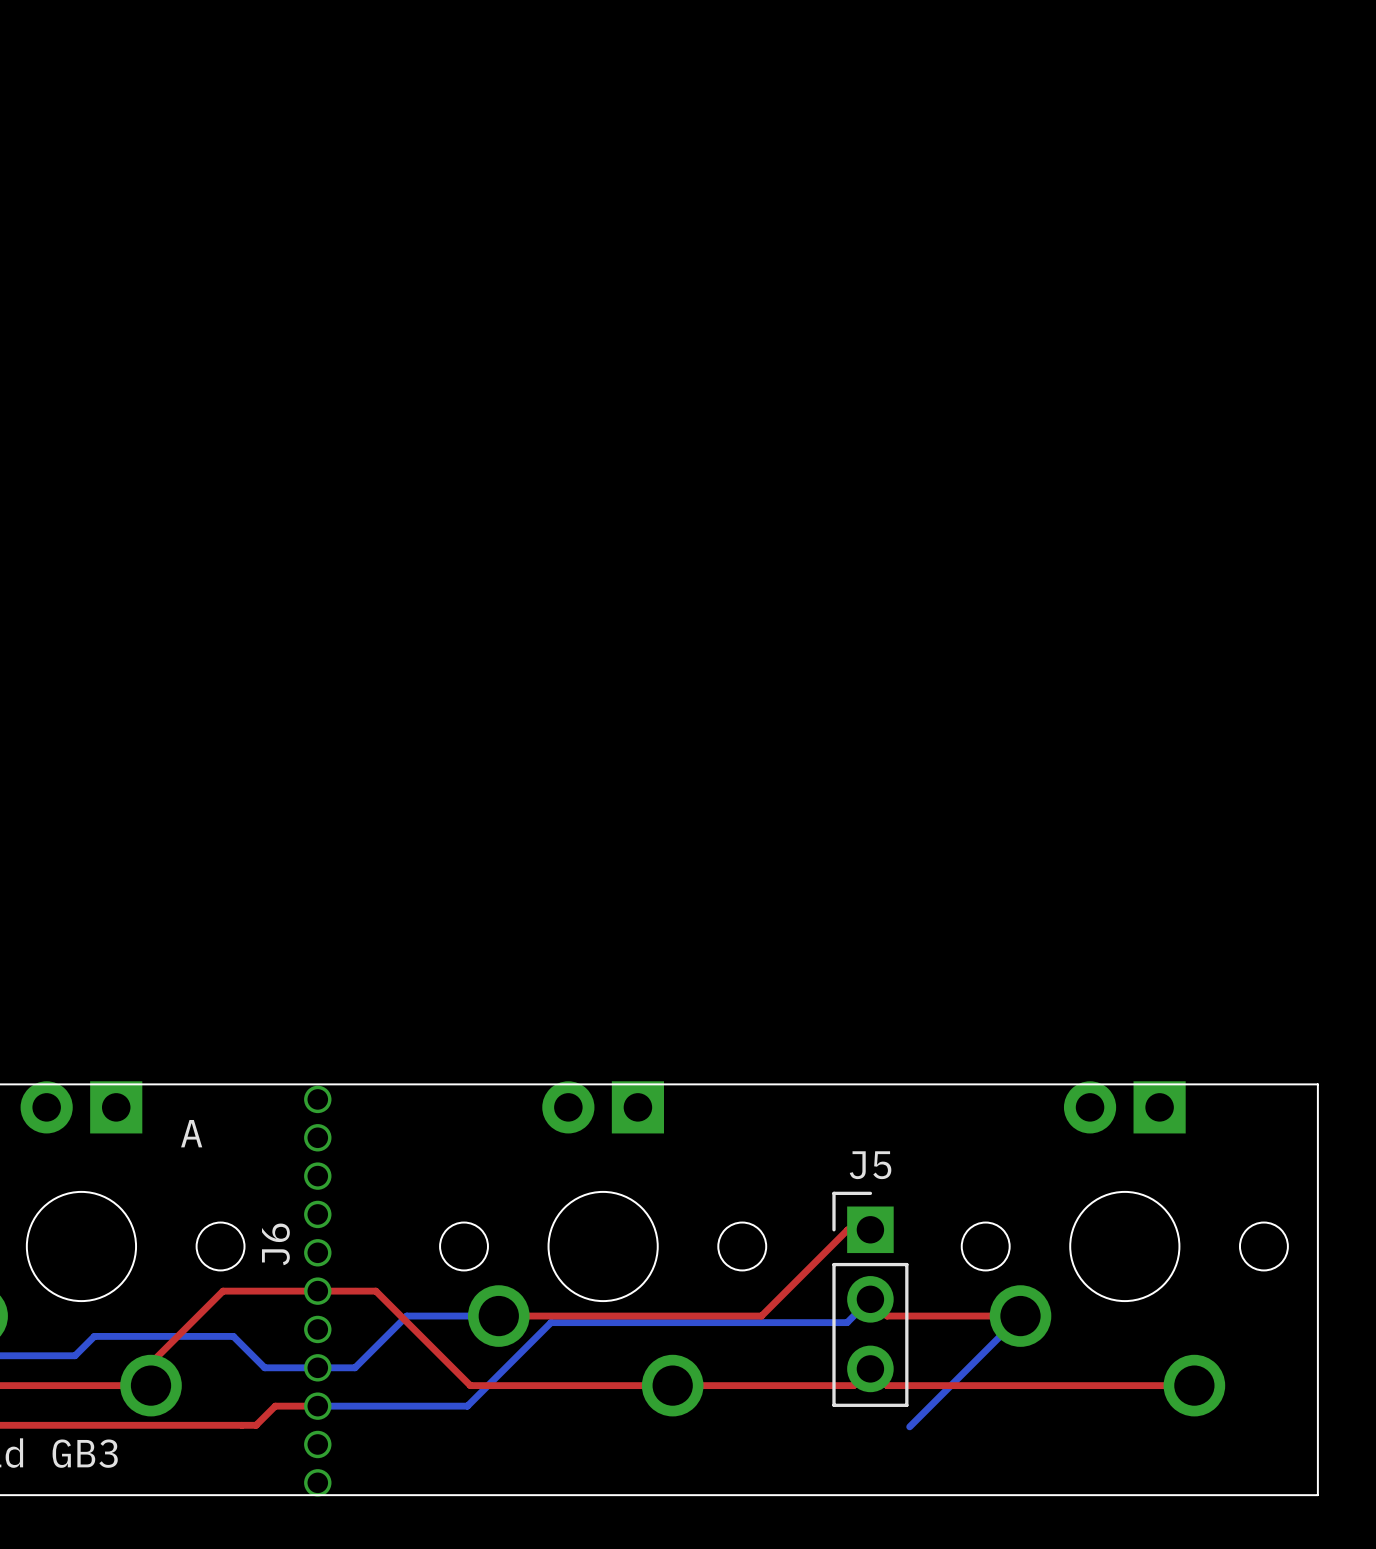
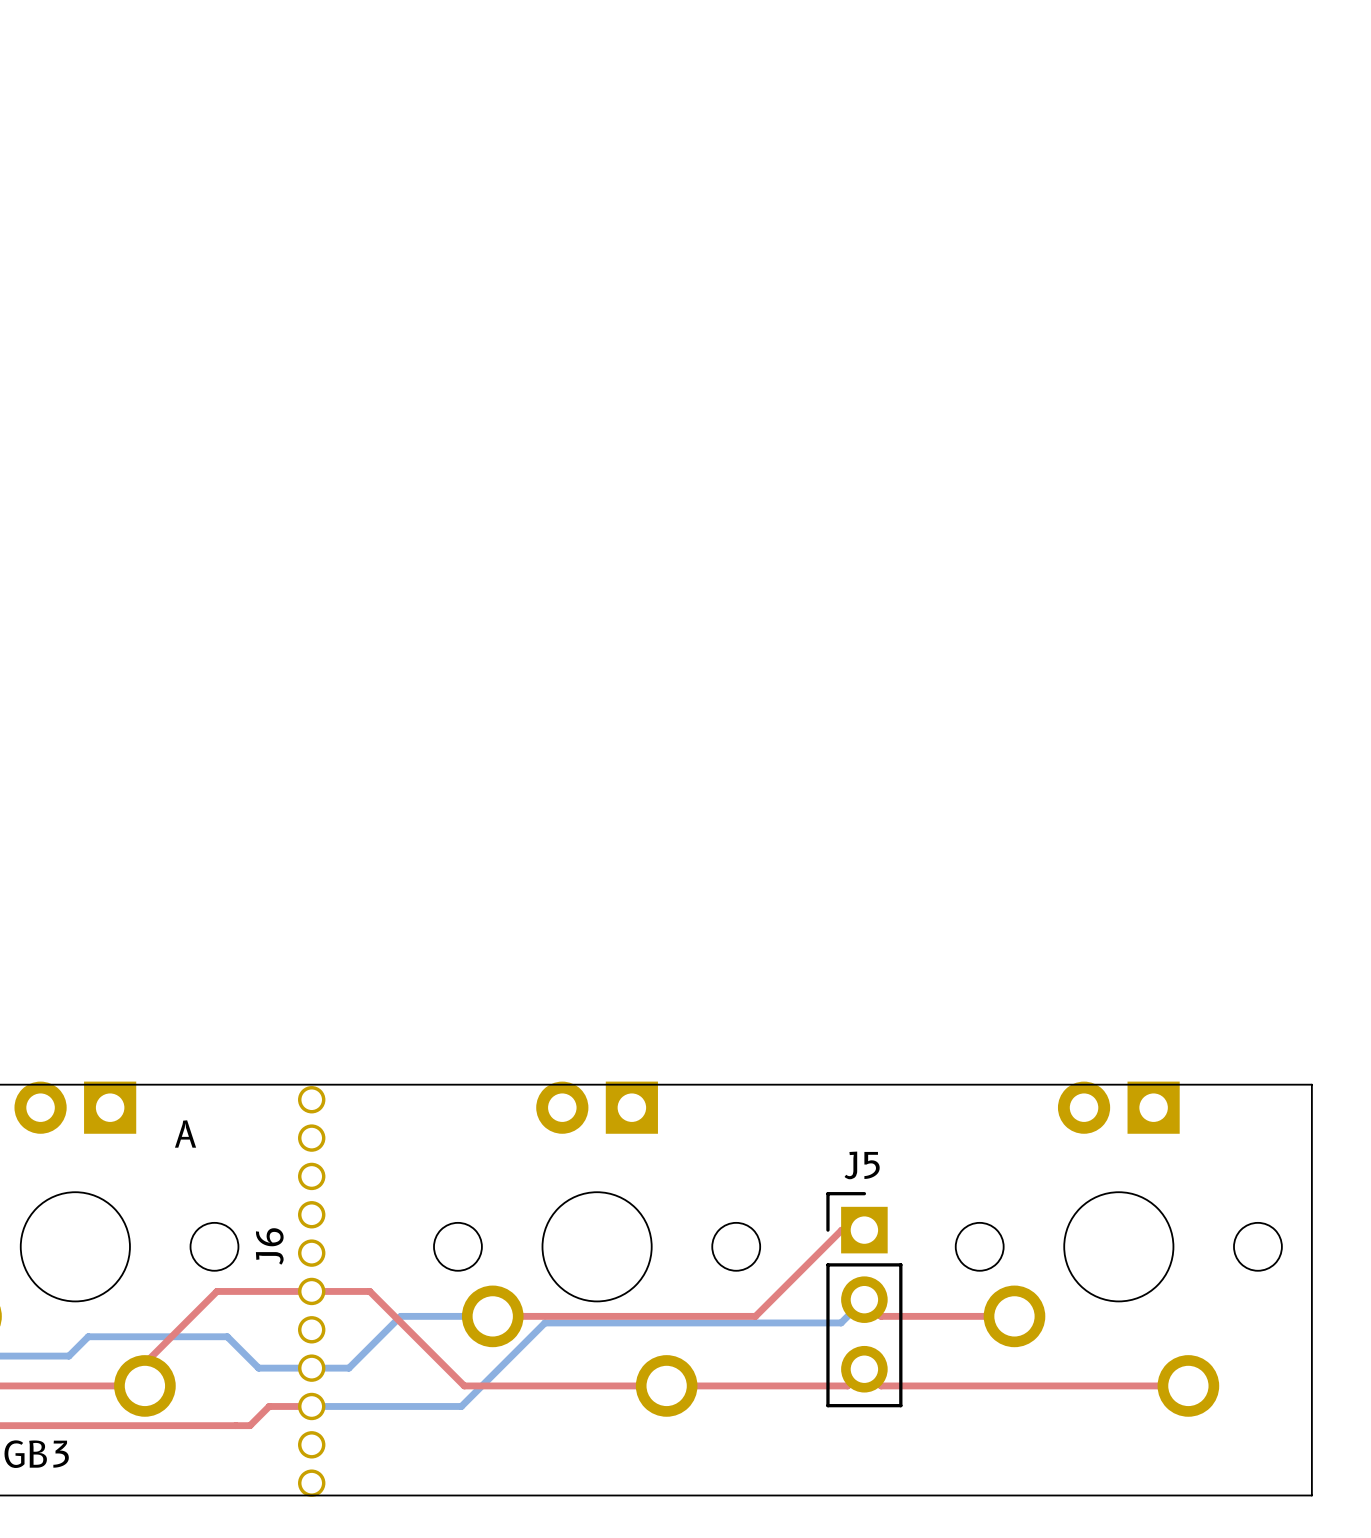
bottom track: (1020, 1316) (909, 1426) -> none

